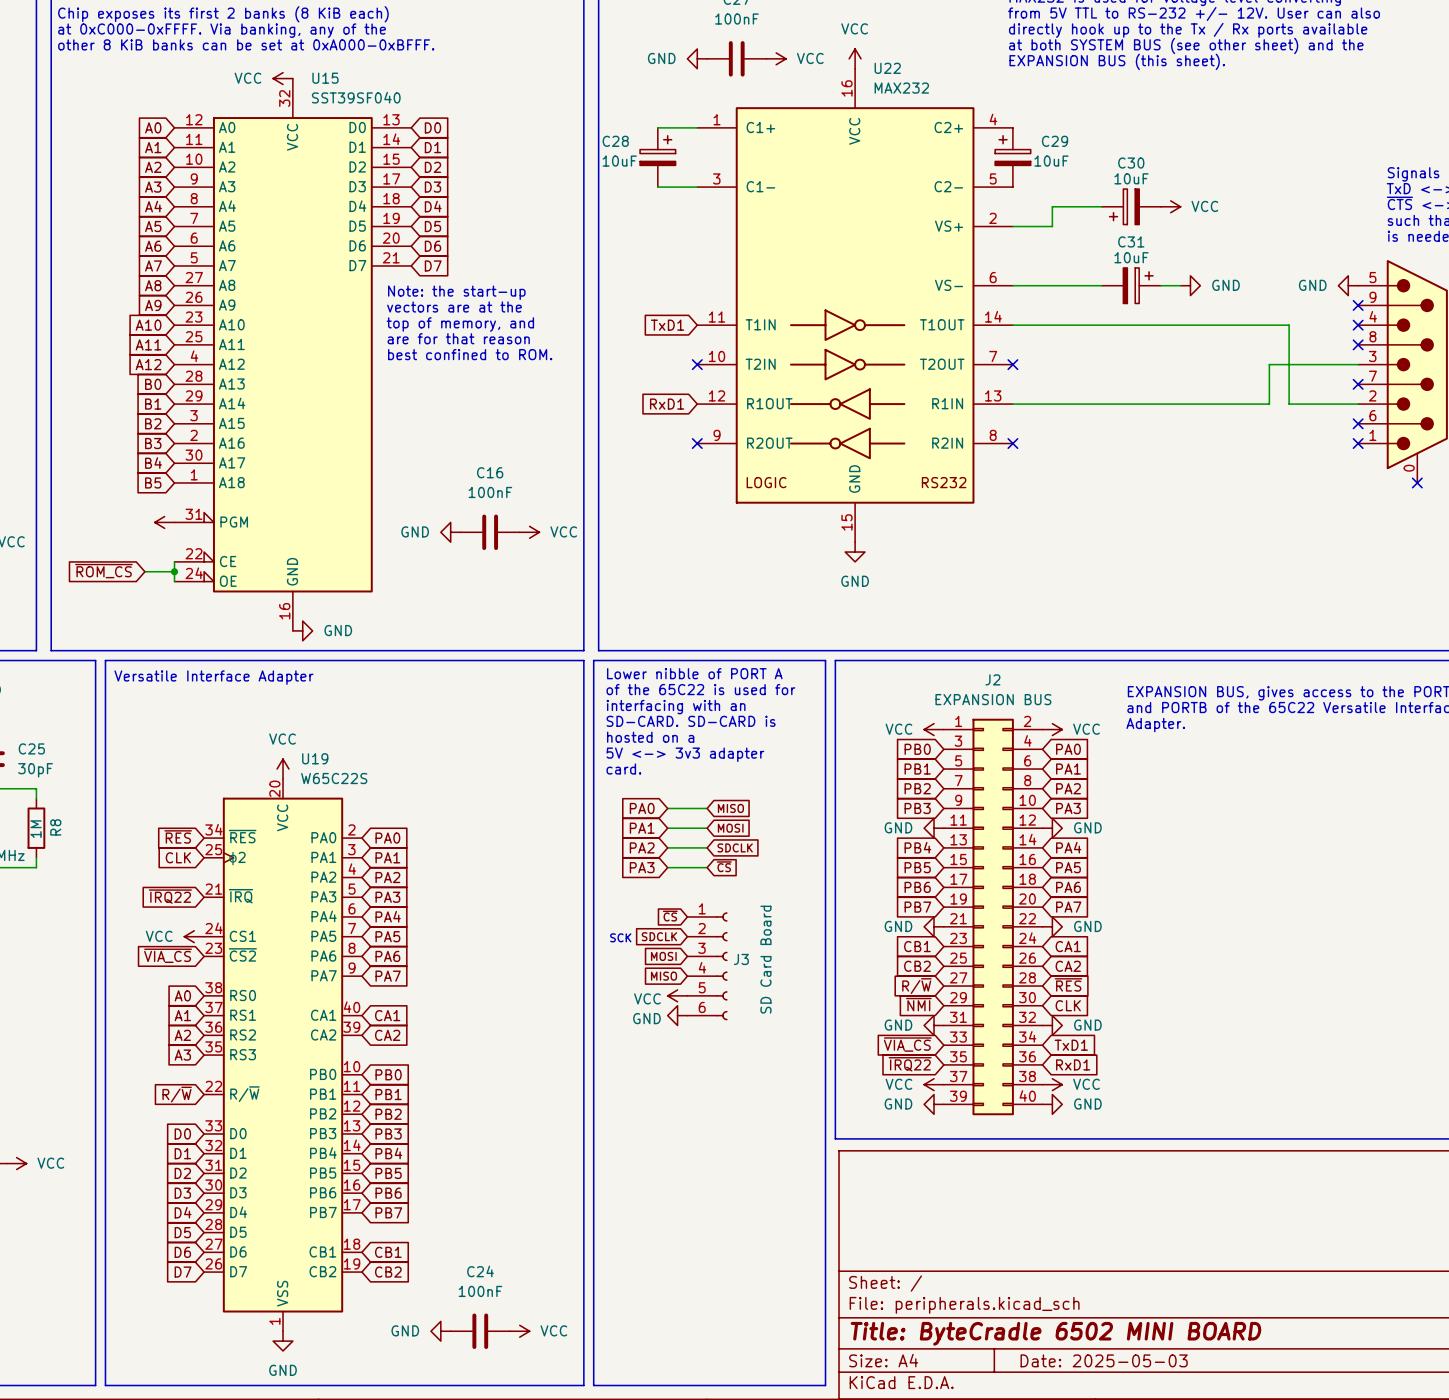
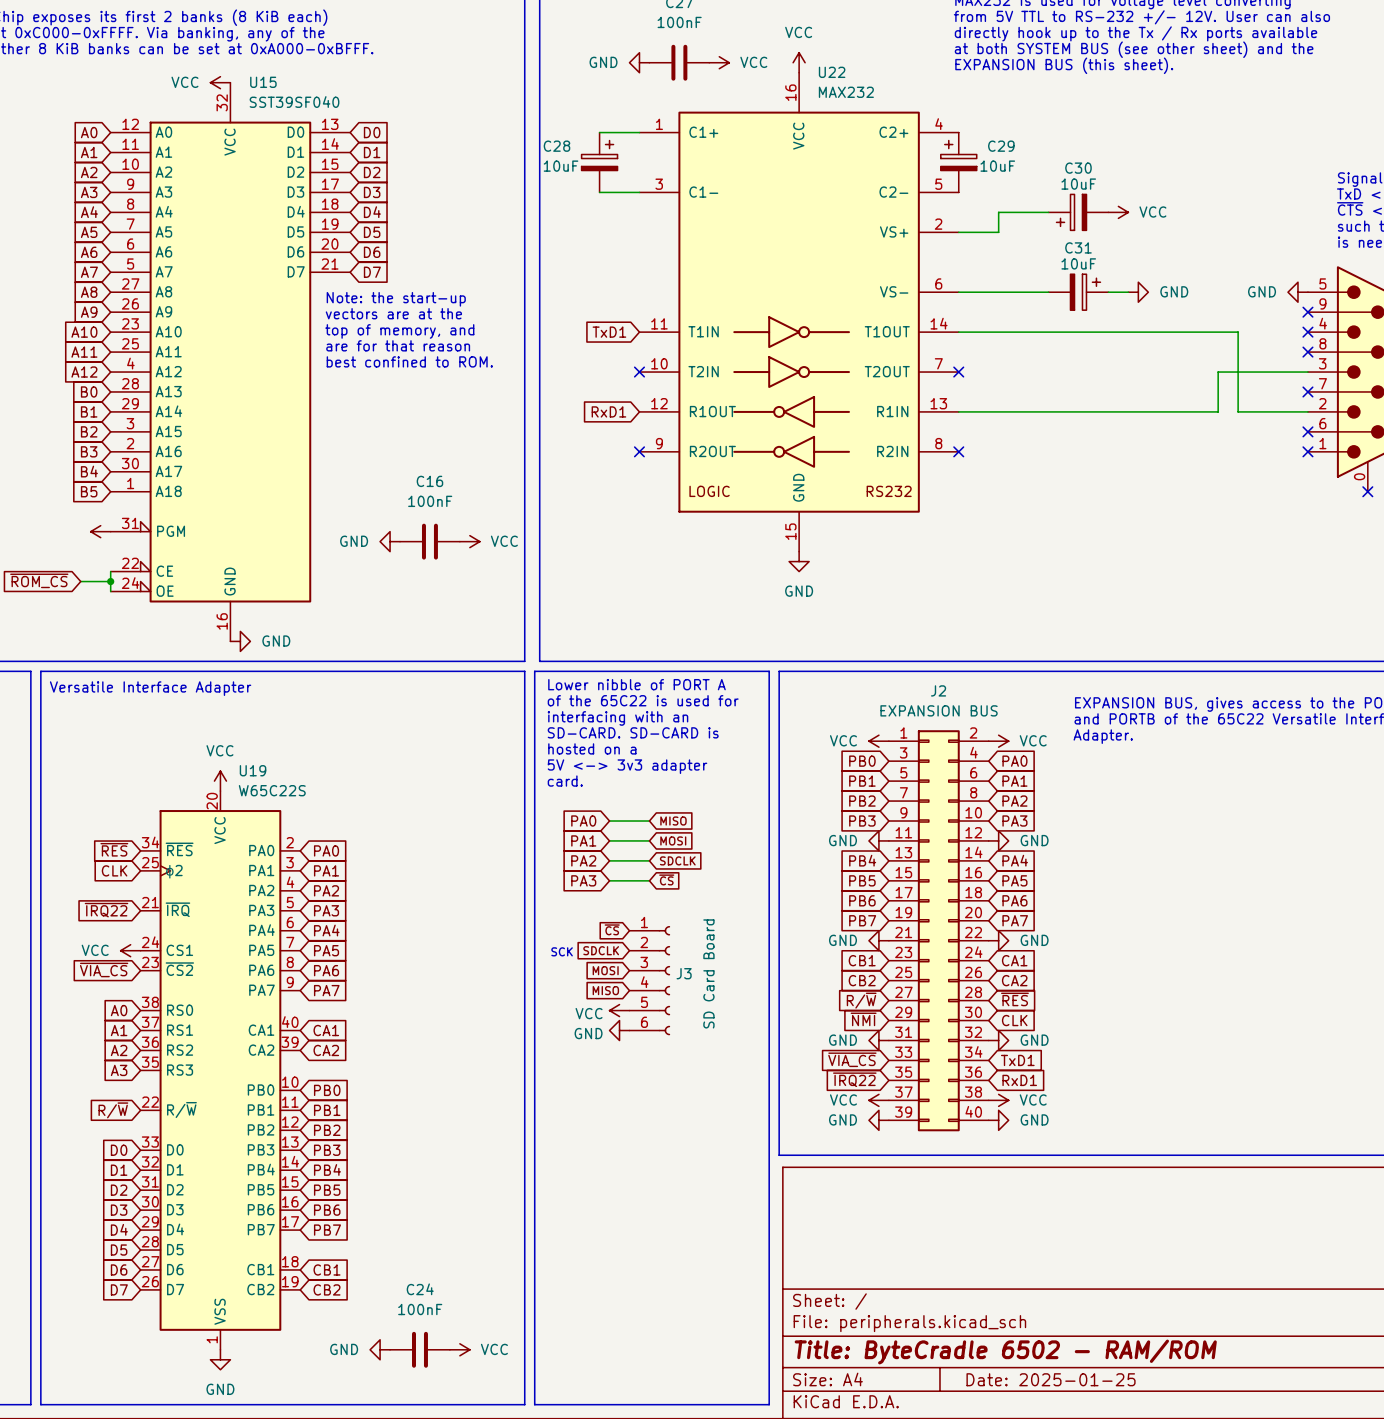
title block: Title: ByteCradle 6502 MINI BOARD (1055, 1333) -> Title: ByteCradle 6502 - RAM/ROM (1005, 1352)
title block: Date: 2025-05-03 (1104, 1360) -> Date: 2025-01-25 (1051, 1379)

